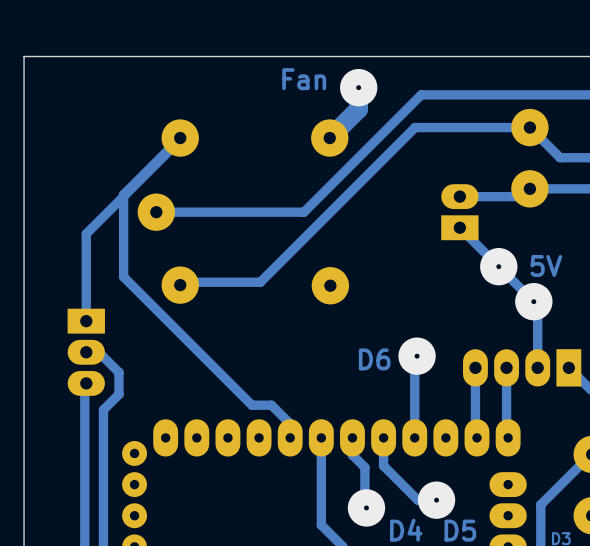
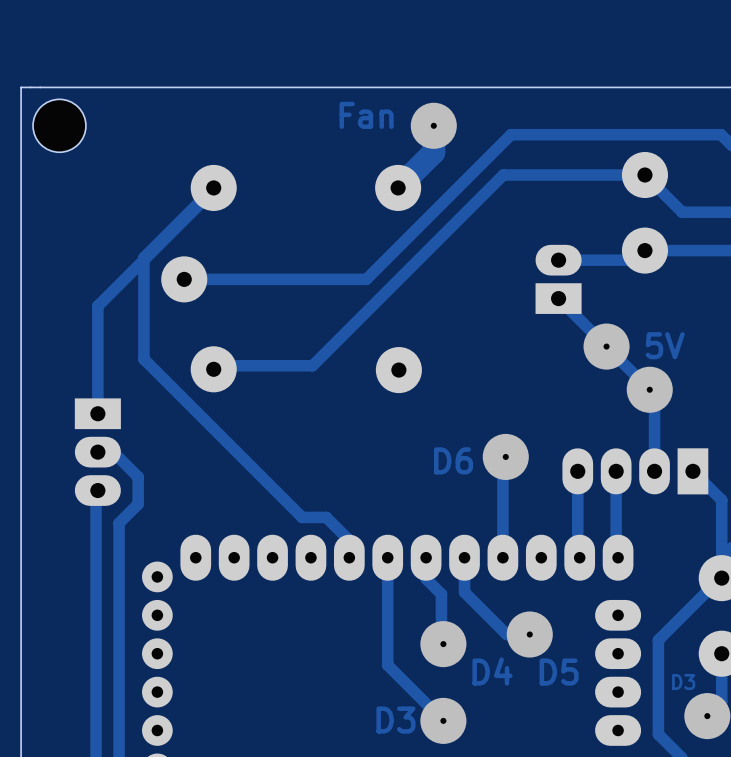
part: none -> (59, 125)

